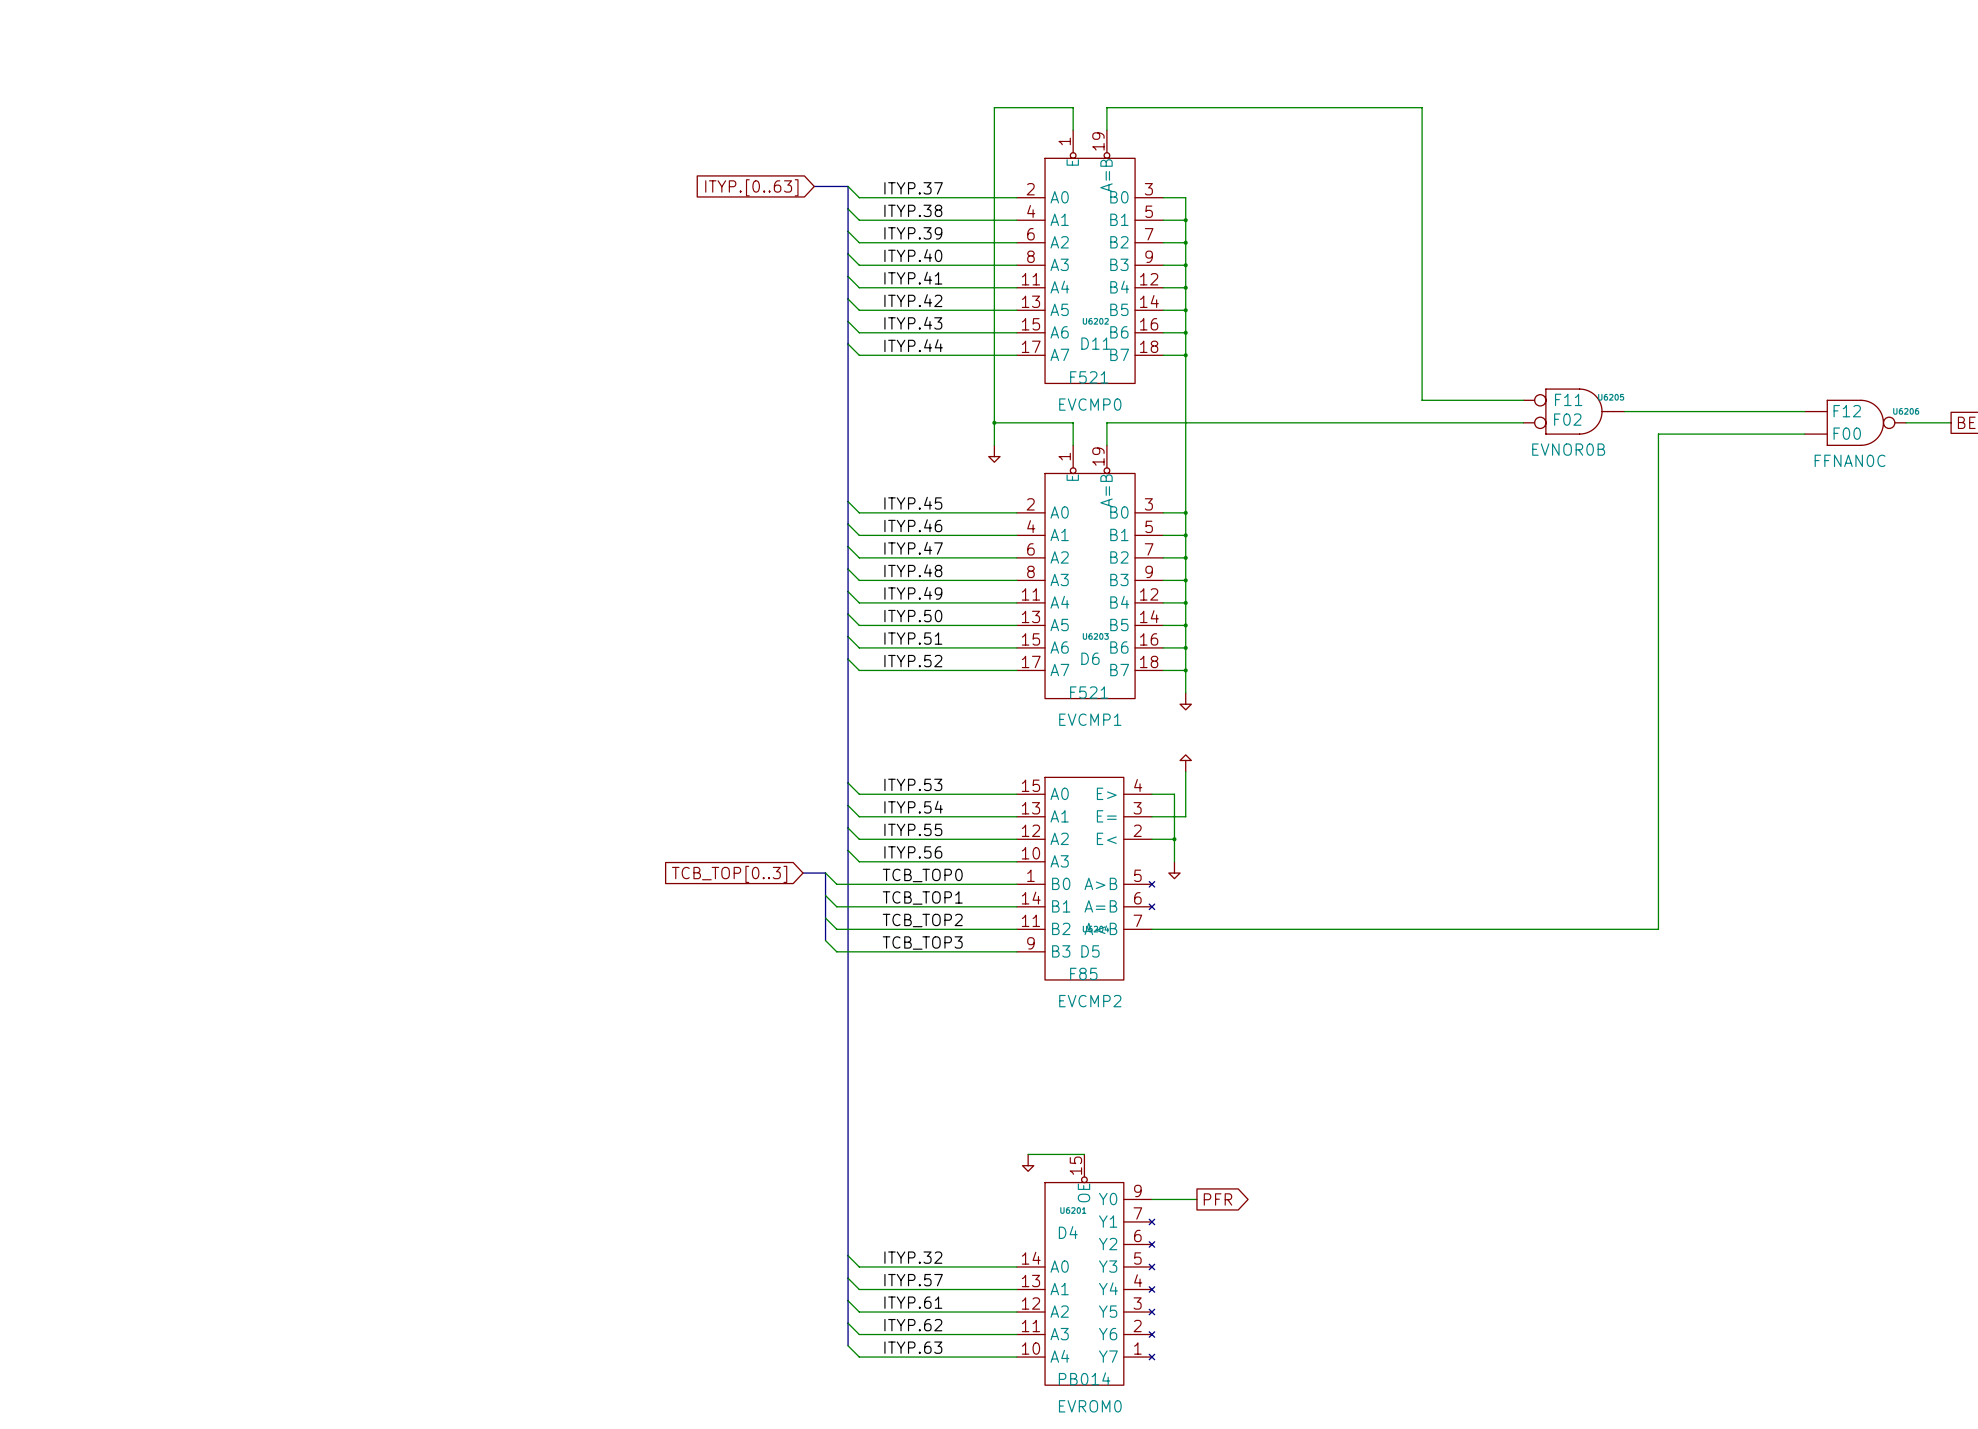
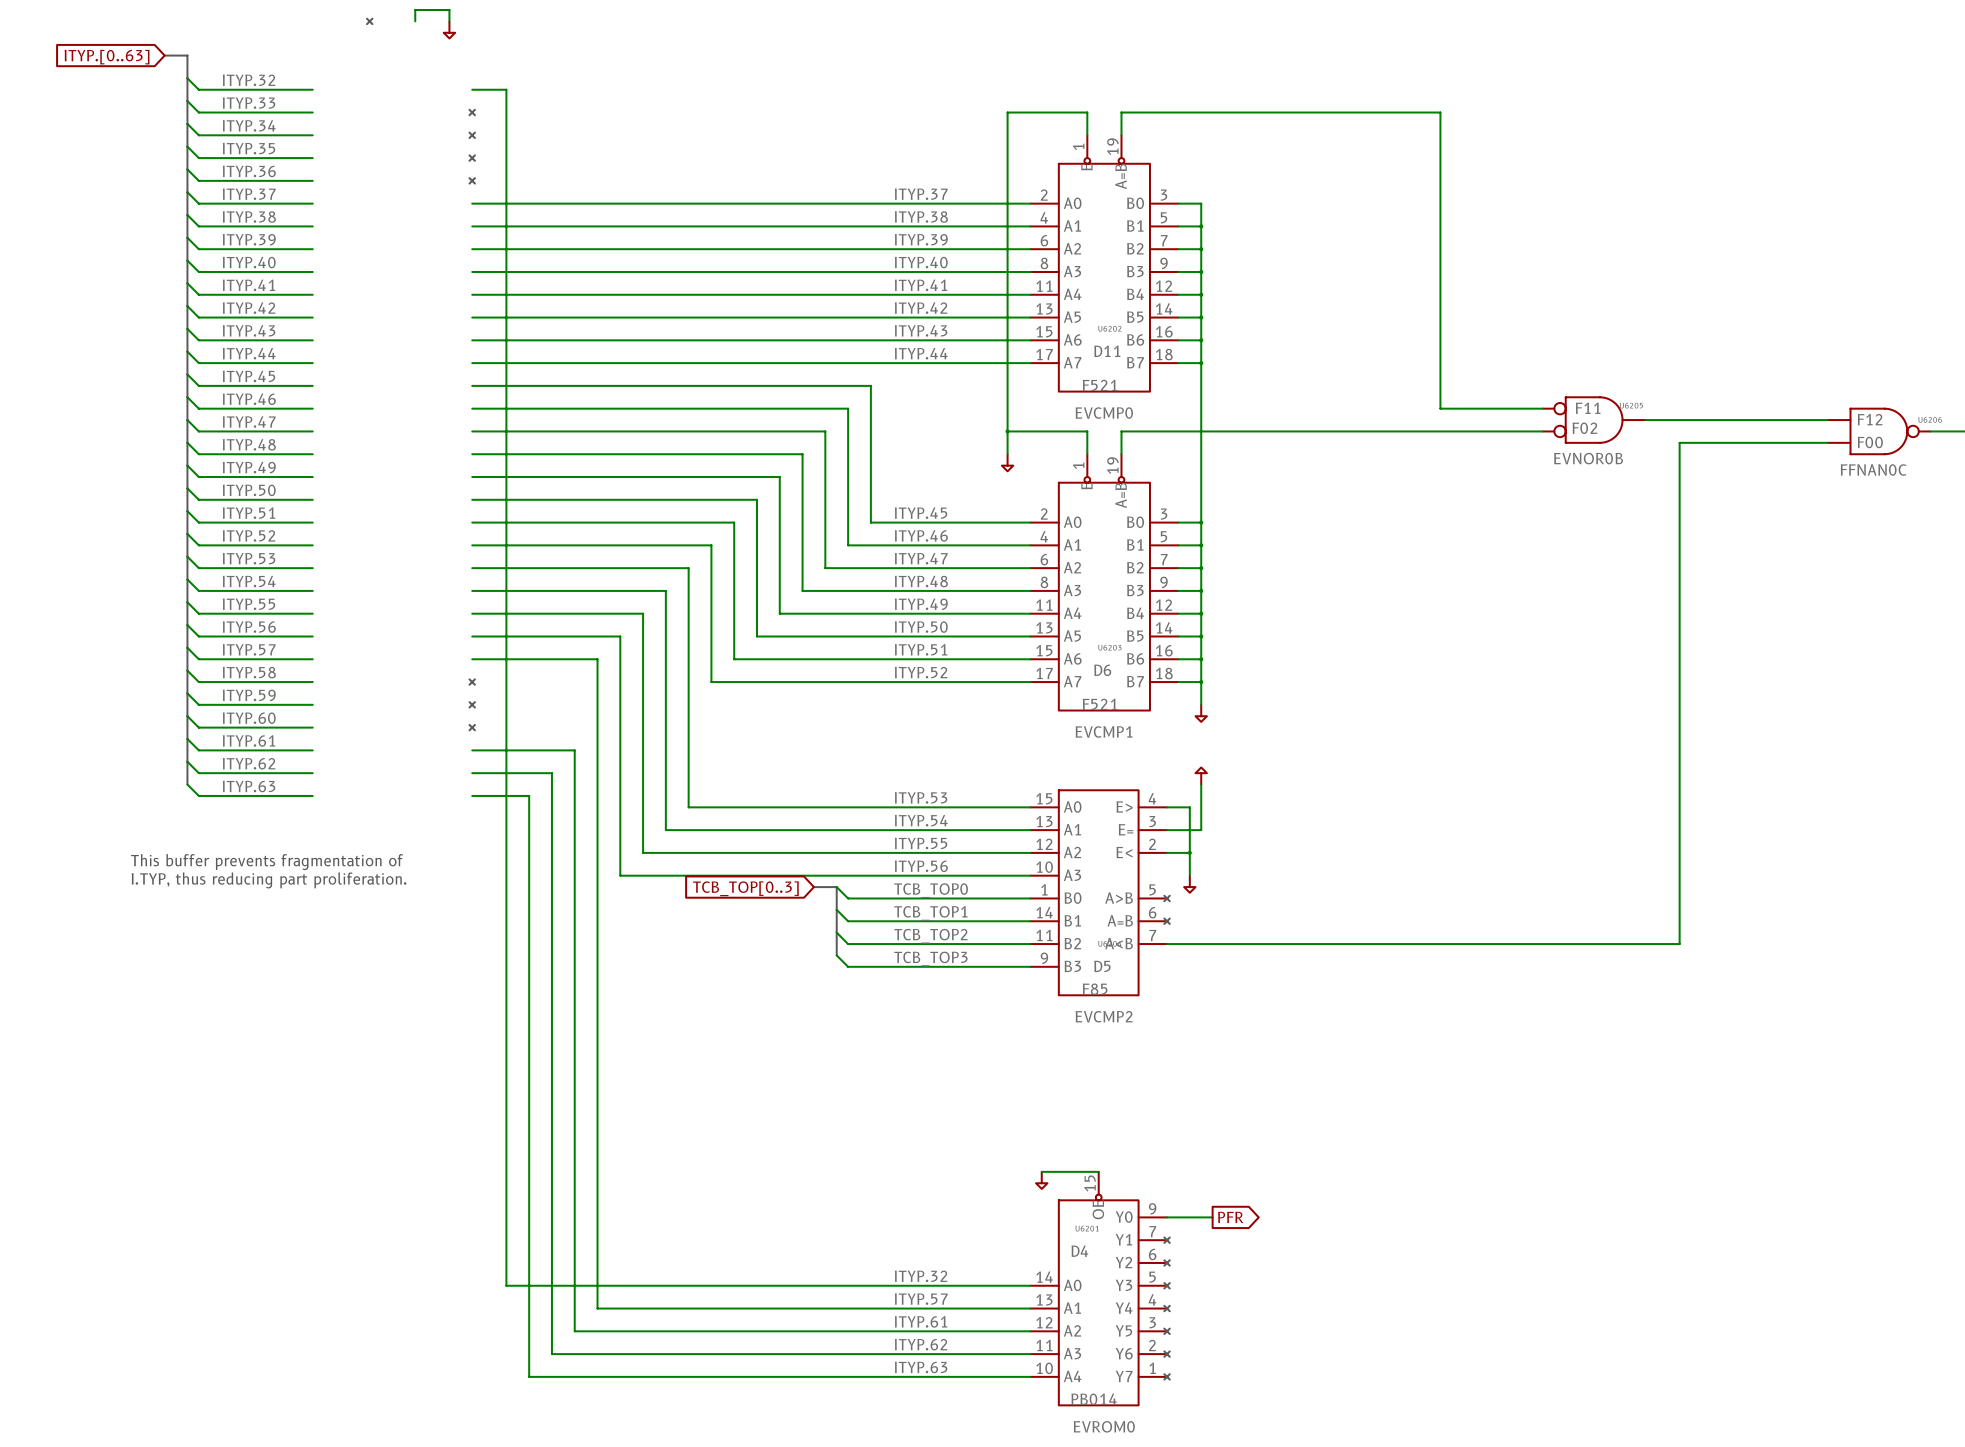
no-connect mark: none -> (369, 21)
wire: none -> (415, 21) (415, 10) (449, 10) (449, 21)
power symbol: none -> (449, 30)
bus: none -> (164, 55) (187, 55) (187, 784)
global label: none -> ITYP.[0..63] (107, 57)
wire: none -> (187, 78) (198, 89) (312, 89)
label: none -> ITYP.32 (249, 80)
wire: none -> (187, 101) (198, 112) (312, 112)
label: none -> ITYP.33 (249, 103)
no-connect mark: none -> (472, 112)
wire: none -> (187, 123) (198, 135) (312, 135)
label: none -> ITYP.34 (249, 125)
no-connect mark: none -> (472, 135)
wire: none -> (187, 146) (198, 158) (312, 158)
label: none -> ITYP.35 (249, 148)
no-connect mark: none -> (472, 158)
wire: none -> (187, 169) (198, 180) (312, 180)
label: none -> ITYP.36 (249, 171)
no-connect mark: none -> (472, 180)
wire: none -> (187, 192) (198, 203) (312, 203)
bus: (814, 186) (848, 186) (848, 1345) -> none
wire: (848, 186) (859, 197) -> (472, 203) (870, 203)
global label: ITYP.[0..63] (751, 187) -> none
label: none -> ITYP.37 (249, 194)
wire: none -> (187, 215) (198, 226) (312, 226)
wire: (848, 208) (859, 220) -> (472, 226) (870, 226)
label: none -> ITYP.38 (249, 217)
wire: none -> (187, 237) (198, 249) (312, 249)
wire: (848, 231) (859, 242) -> (472, 249) (870, 249)
label: none -> ITYP.39 (249, 239)
wire: none -> (187, 260) (198, 271) (312, 271)
wire: (848, 253) (859, 265) -> (472, 271) (870, 271)
label: none -> ITYP.40 (249, 262)
wire: none -> (187, 283) (198, 294) (312, 294)
wire: (848, 276) (859, 287) -> (472, 294) (870, 294)
label: none -> ITYP.41 (249, 285)
wire: none -> (187, 306) (198, 317) (312, 317)
wire: (848, 299) (859, 310) -> (472, 317) (870, 317)
label: none -> ITYP.42 (249, 308)
wire: none -> (187, 328) (198, 340) (312, 340)
wire: (848, 321) (859, 332) -> (472, 340) (870, 340)
label: none -> ITYP.43 (249, 330)
wire: none -> (187, 351) (198, 363) (312, 363)
wire: (848, 344) (859, 355) -> (472, 363) (870, 363)
label: none -> ITYP.44 (249, 353)
wire: none -> (187, 374) (198, 385) (312, 385)
label: none -> ITYP.45 (249, 376)
wire: none -> (187, 397) (198, 408) (312, 408)
label: none -> ITYP.46 (249, 399)
wire: none -> (187, 420) (198, 431) (312, 431)
label: none -> ITYP.47 (249, 422)
wire: none -> (187, 442) (198, 454) (312, 454)
label: none -> ITYP.48 (249, 444)
wire: none -> (187, 465) (198, 477) (312, 477)
label: none -> ITYP.49 (249, 467)
wire: none -> (187, 488) (198, 499) (312, 499)
label: none -> ITYP.50 (249, 490)
wire: none -> (187, 511) (198, 522) (312, 522)
wire: (848, 501) (859, 512) -> (472, 385) (870, 385) (870, 522)
label: none -> ITYP.51 (249, 513)
wire: none -> (187, 533) (198, 545) (312, 545)
wire: (848, 524) (859, 535) -> (472, 408) (848, 408) (848, 545) (870, 545)
label: none -> ITYP.52 (249, 535)
wire: none -> (187, 556) (198, 568) (312, 568)
wire: (848, 546) (859, 557) -> (472, 431) (825, 431) (825, 568) (870, 568)
label: none -> ITYP.53 (249, 558)
wire: none -> (187, 579) (198, 590) (312, 590)
wire: (848, 569) (859, 580) -> (472, 454) (802, 454) (802, 590) (870, 590)
label: none -> ITYP.54 (249, 581)
wire: none -> (187, 602) (198, 613) (312, 613)
wire: (848, 591) (859, 602) -> (472, 477) (779, 477) (779, 613) (870, 613)
label: none -> ITYP.55 (249, 604)
wire: none -> (187, 625) (198, 636) (312, 636)
wire: (848, 614) (859, 625) -> (472, 499) (756, 499) (756, 636) (870, 636)
label: none -> ITYP.56 (249, 627)
wire: none -> (187, 647) (198, 659) (312, 659)
wire: (848, 636) (859, 647) -> (472, 522) (734, 522) (734, 659) (870, 659)
label: none -> ITYP.57 (249, 649)
wire: none -> (187, 670) (198, 682) (312, 682)
wire: (848, 659) (859, 670) -> (472, 545) (711, 545) (711, 682) (870, 682)
label: none -> ITYP.58 (249, 672)
no-connect mark: none -> (472, 682)
wire: none -> (187, 693) (198, 704) (312, 704)
label: none -> ITYP.59 (249, 695)
no-connect mark: none -> (472, 704)
wire: none -> (187, 716) (198, 727) (312, 727)
label: none -> ITYP.60 (249, 718)
no-connect mark: none -> (472, 727)
wire: none -> (187, 739) (198, 750) (312, 750)
label: none -> ITYP.61 (249, 740)
wire: none -> (187, 761) (198, 773) (312, 773)
label: none -> ITYP.62 (249, 763)
wire: none -> (187, 784) (198, 795) (312, 795)
label: none -> ITYP.63 (249, 786)
wire: (848, 783) (859, 794) -> (472, 568) (688, 568) (688, 807) (870, 807)
wire: (848, 805) (859, 816) -> (472, 590) (665, 590) (665, 830) (870, 830)
wire: (848, 828) (859, 839) -> (472, 613) (643, 613) (643, 852) (870, 852)
text: none -> This buffer prevents fragmentation of (267, 862)
wire: (848, 850) (859, 861) -> (472, 636) (620, 636) (620, 875) (870, 875)
text: none -> I.TYP, thus reducing part proliferation. (269, 880)
wire: (848, 1255) (859, 1266) -> (472, 89) (506, 89) (506, 1285) (870, 1285)
wire: (848, 1278) (859, 1289) -> (472, 659) (597, 659) (597, 1308) (870, 1308)
wire: (848, 1300) (859, 1312) -> (472, 750) (574, 750) (574, 1331) (870, 1331)
wire: (848, 1323) (859, 1334) -> (472, 773) (551, 773) (551, 1354) (870, 1354)
wire: (848, 1345) (859, 1357) -> (472, 795) (529, 795) (529, 1376) (870, 1376)

